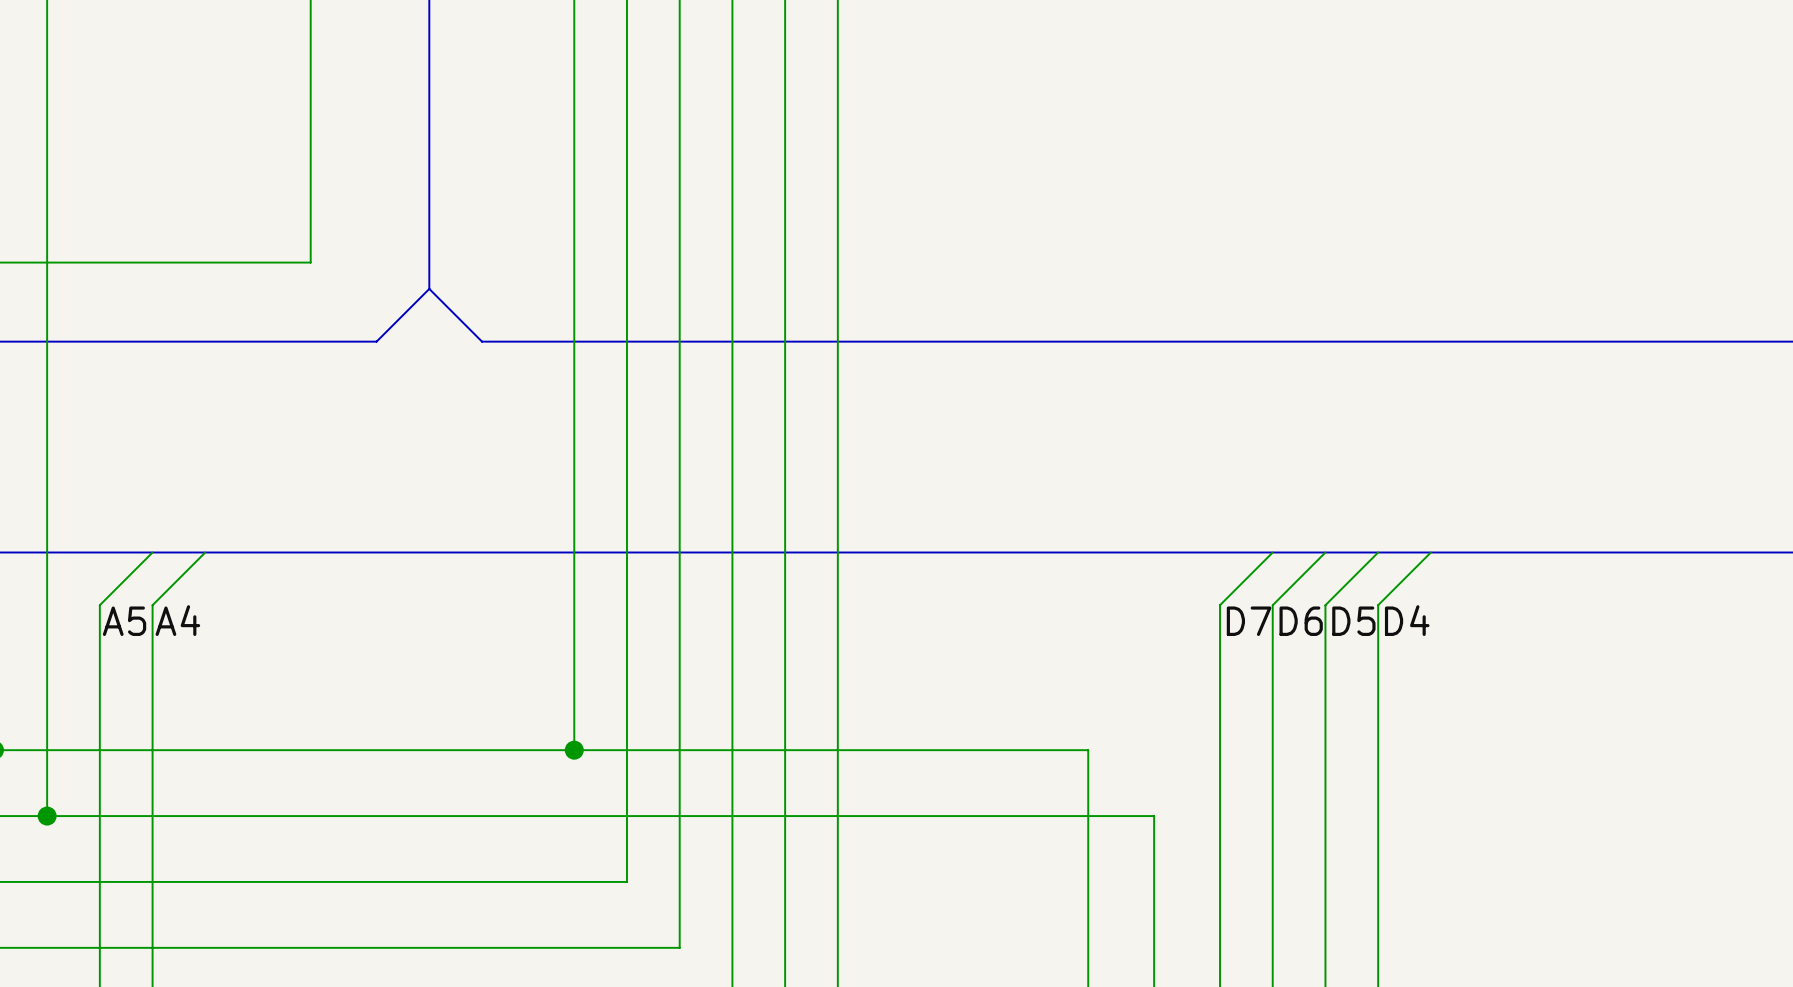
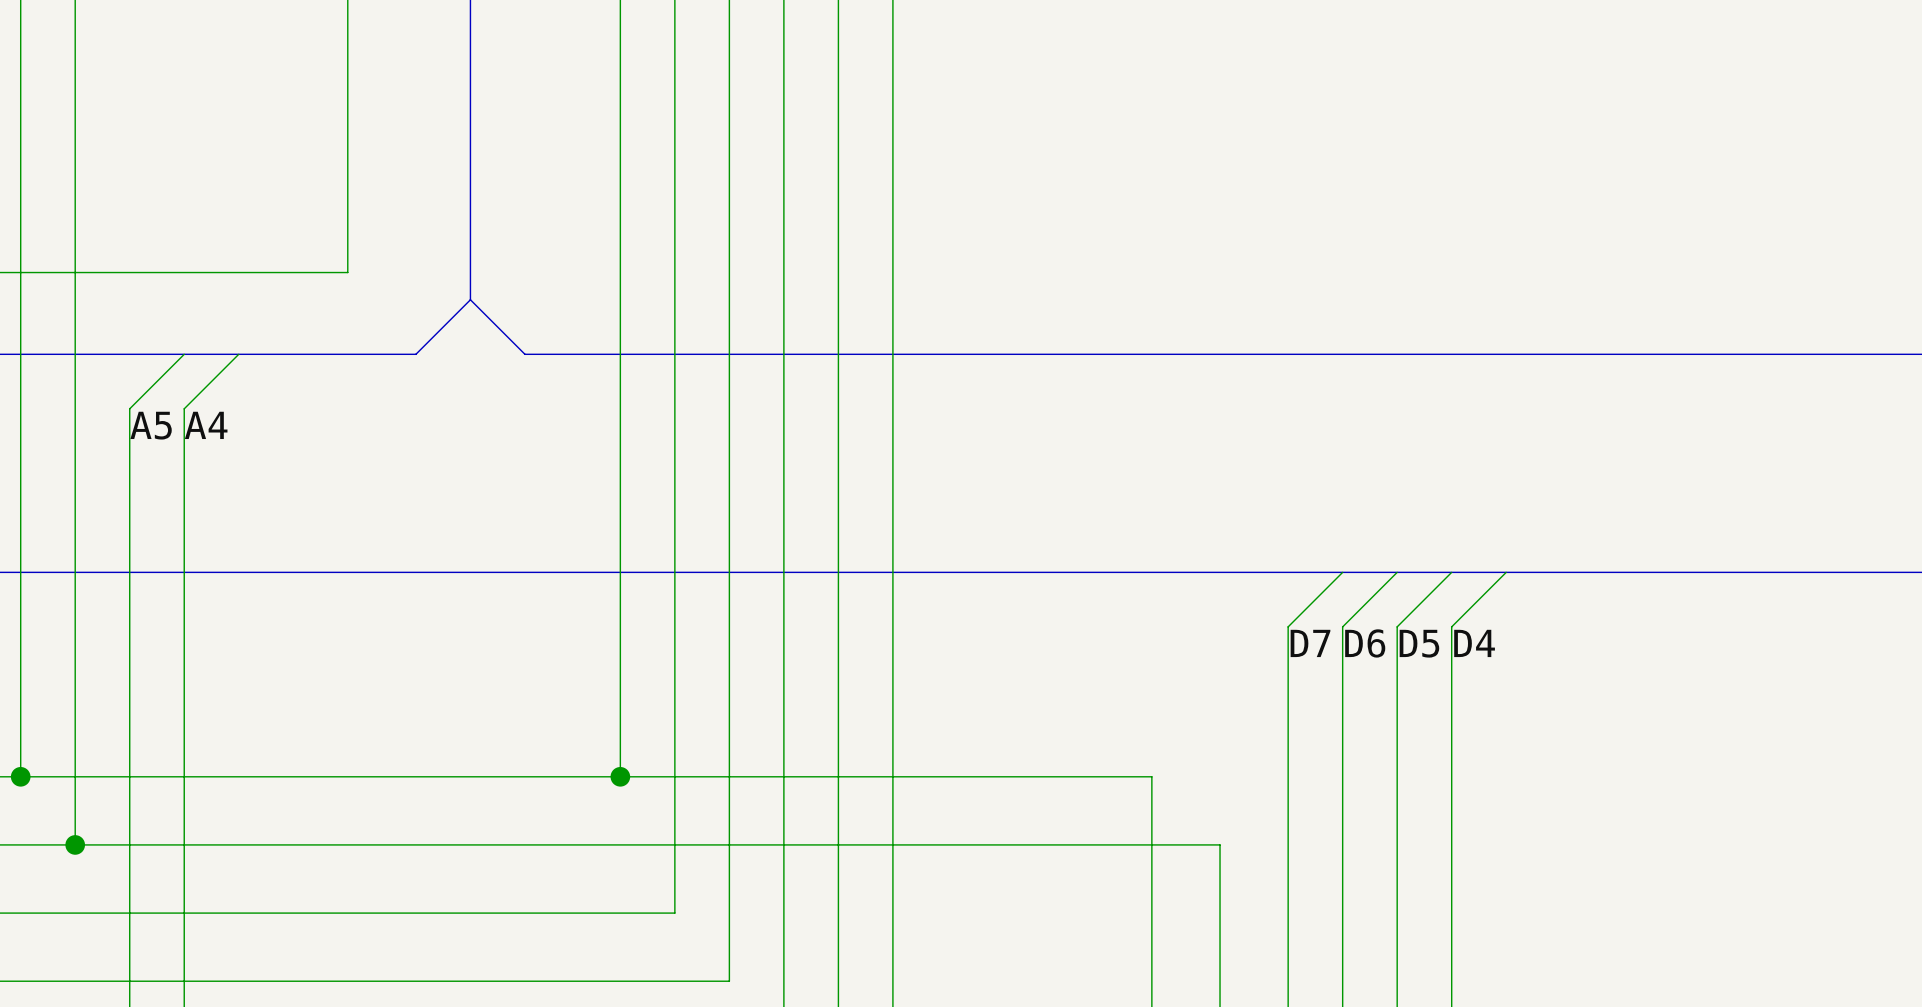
wire: (152, 552) (99, 605) -> (184, 354) (129, 408) (129, 626)
wire: (205, 552) (152, 605) -> (238, 354) (184, 408) (184, 626)
label position: A4 (177, 620) -> A4 (206, 425)
label position: A5 (124, 621) -> A5 (151, 425)

